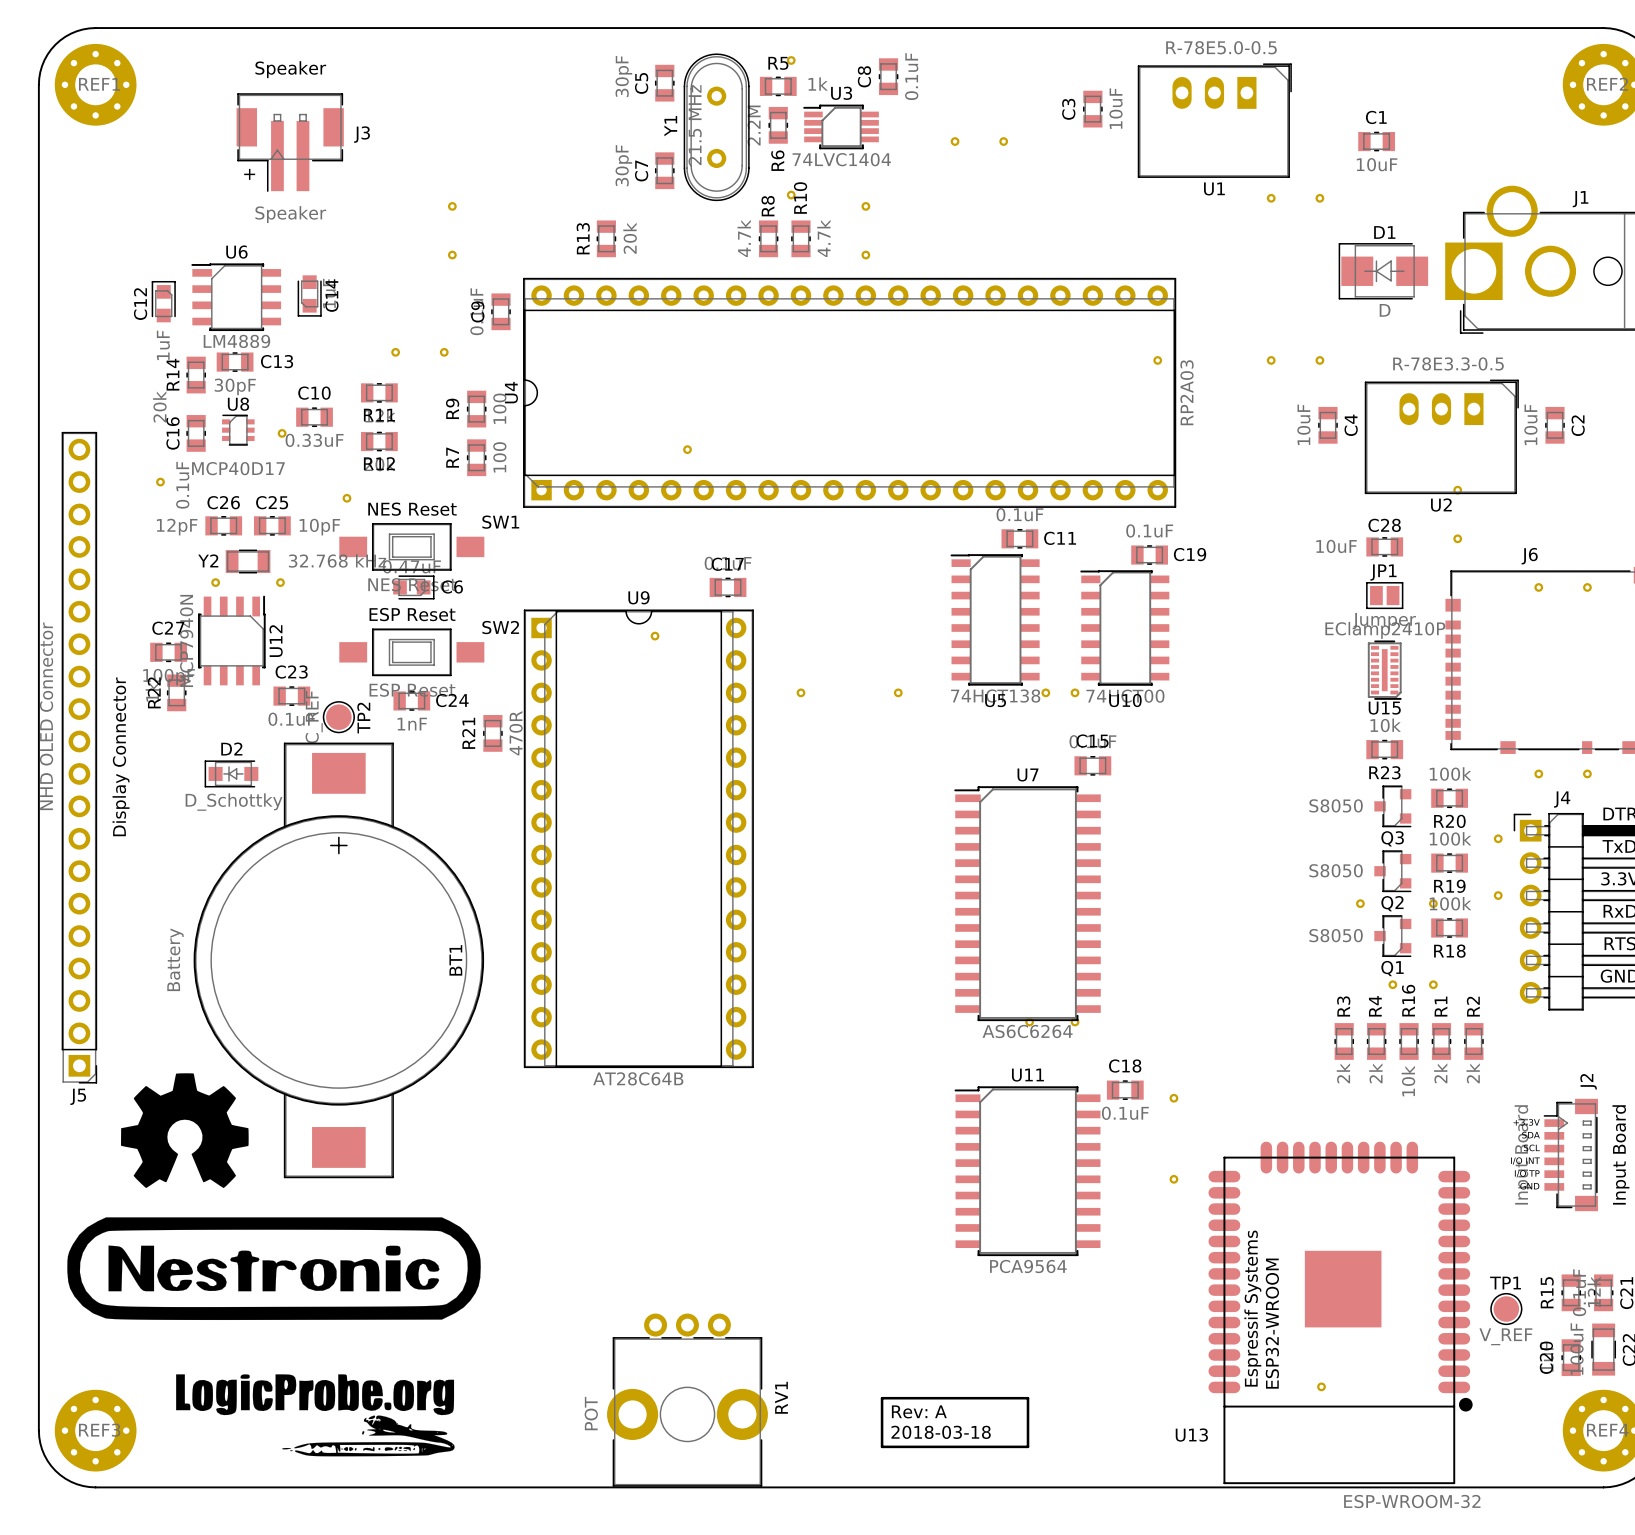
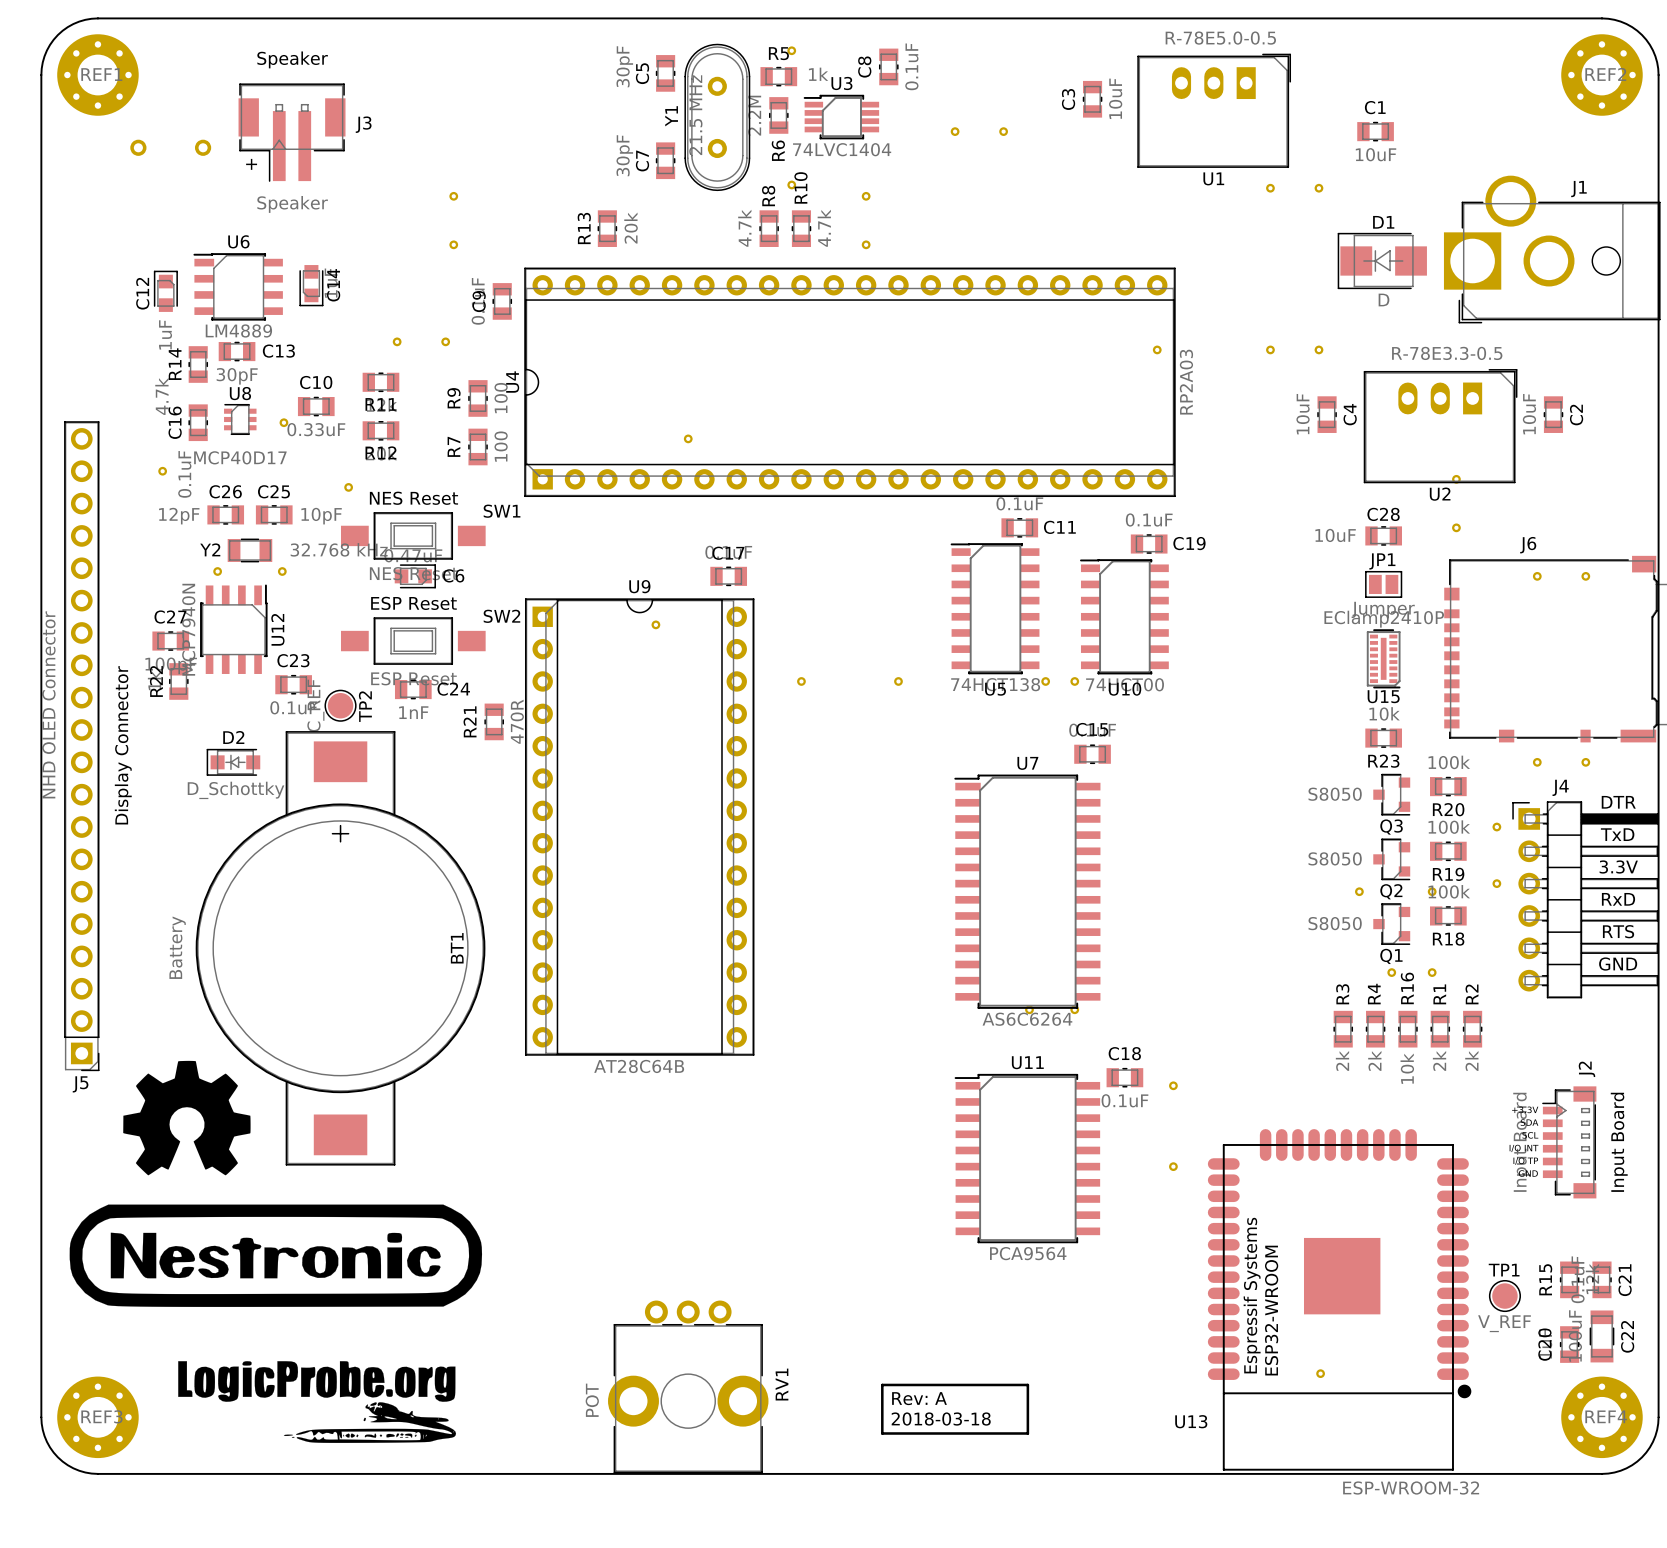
part: none -> (138, 147)
part: none -> (203, 147)
R14 value: 20k (159, 406) -> 4.7k (161, 396)

